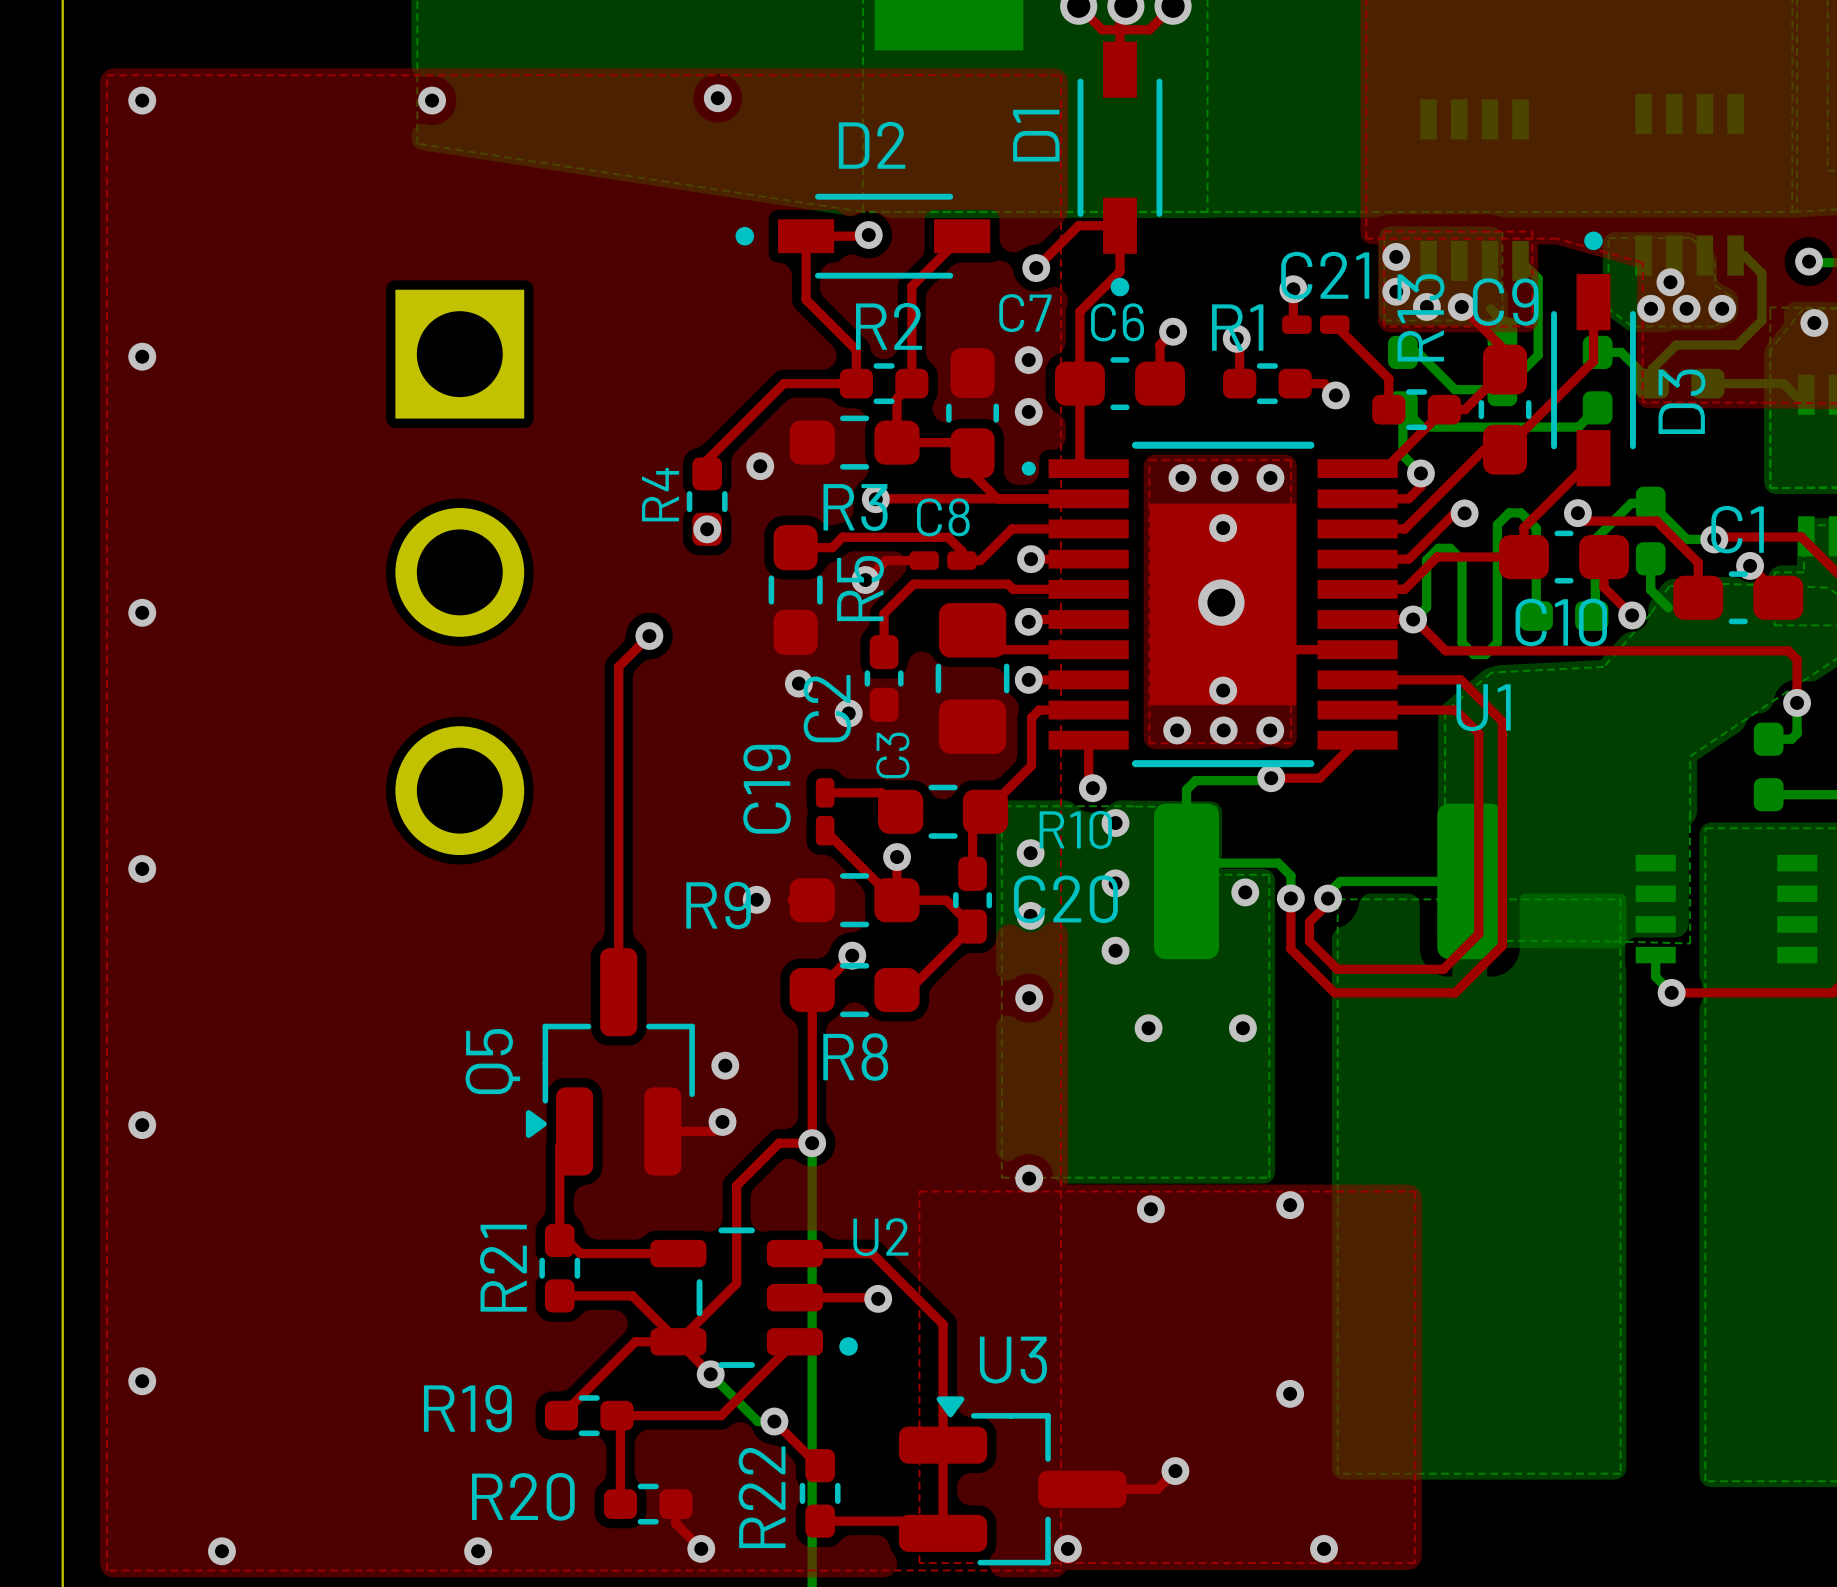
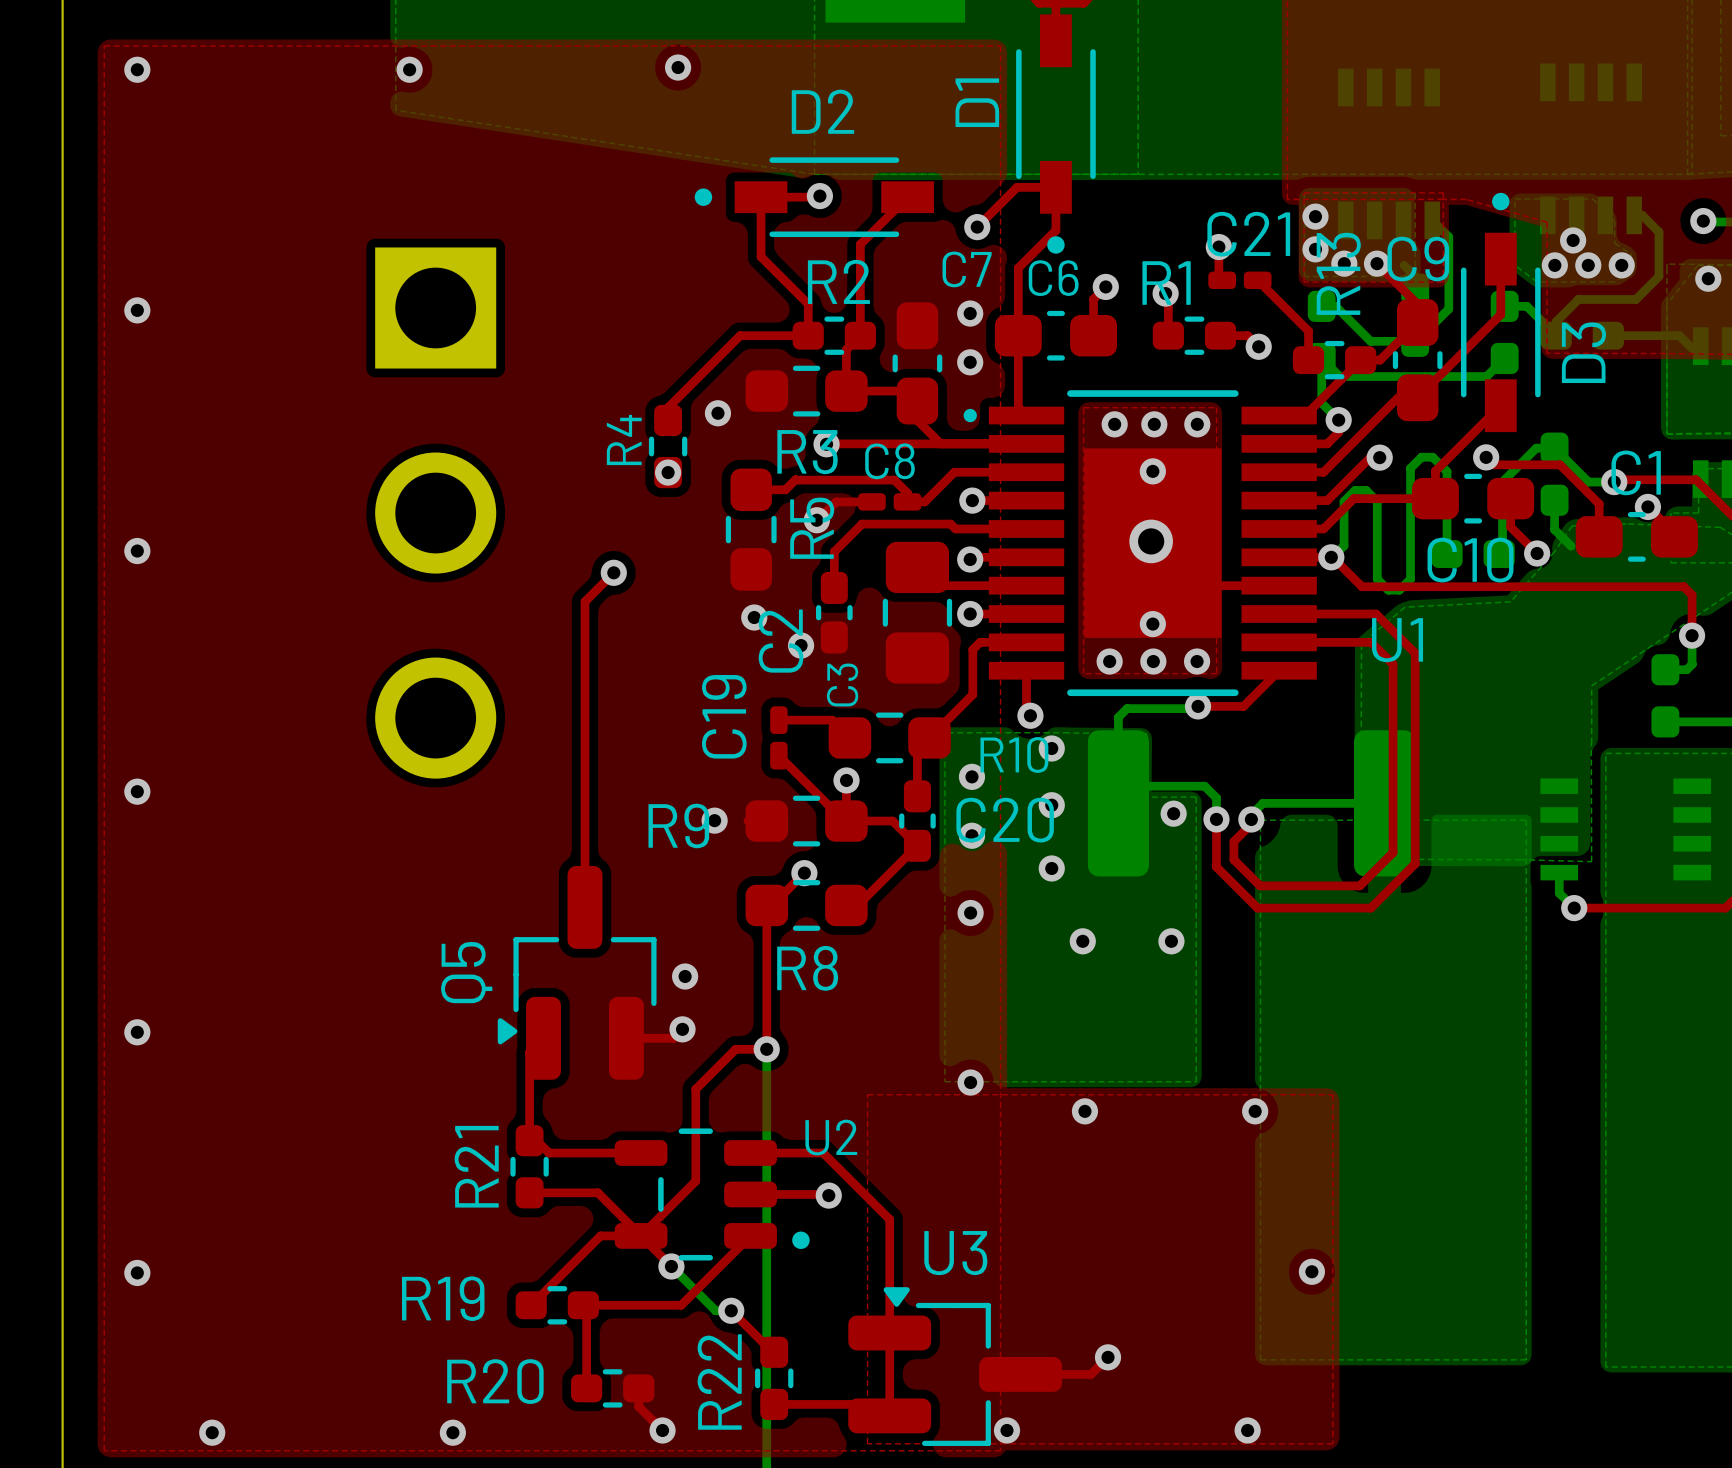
via position: (1290, 1205) -> (1255, 1111)
via: none -> (1311, 1271)
via: (1290, 1393) -> none

